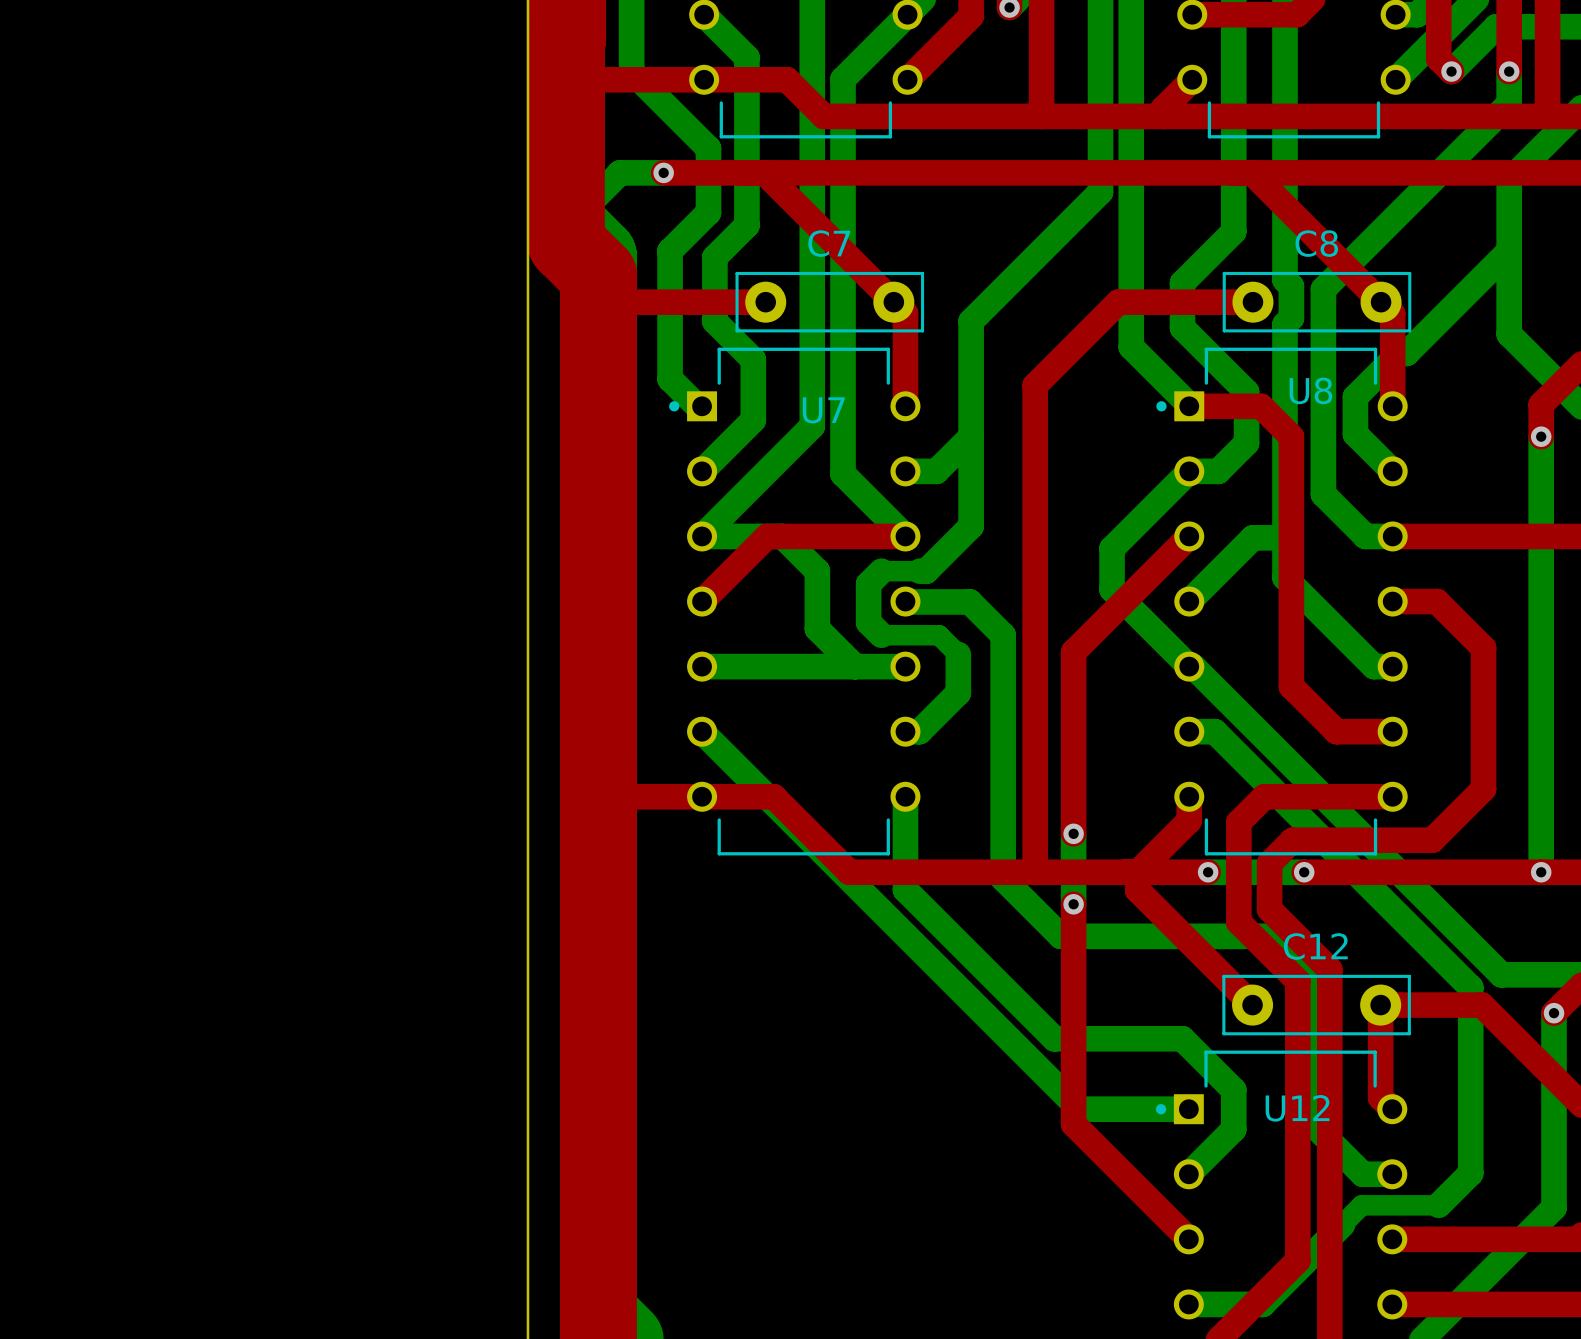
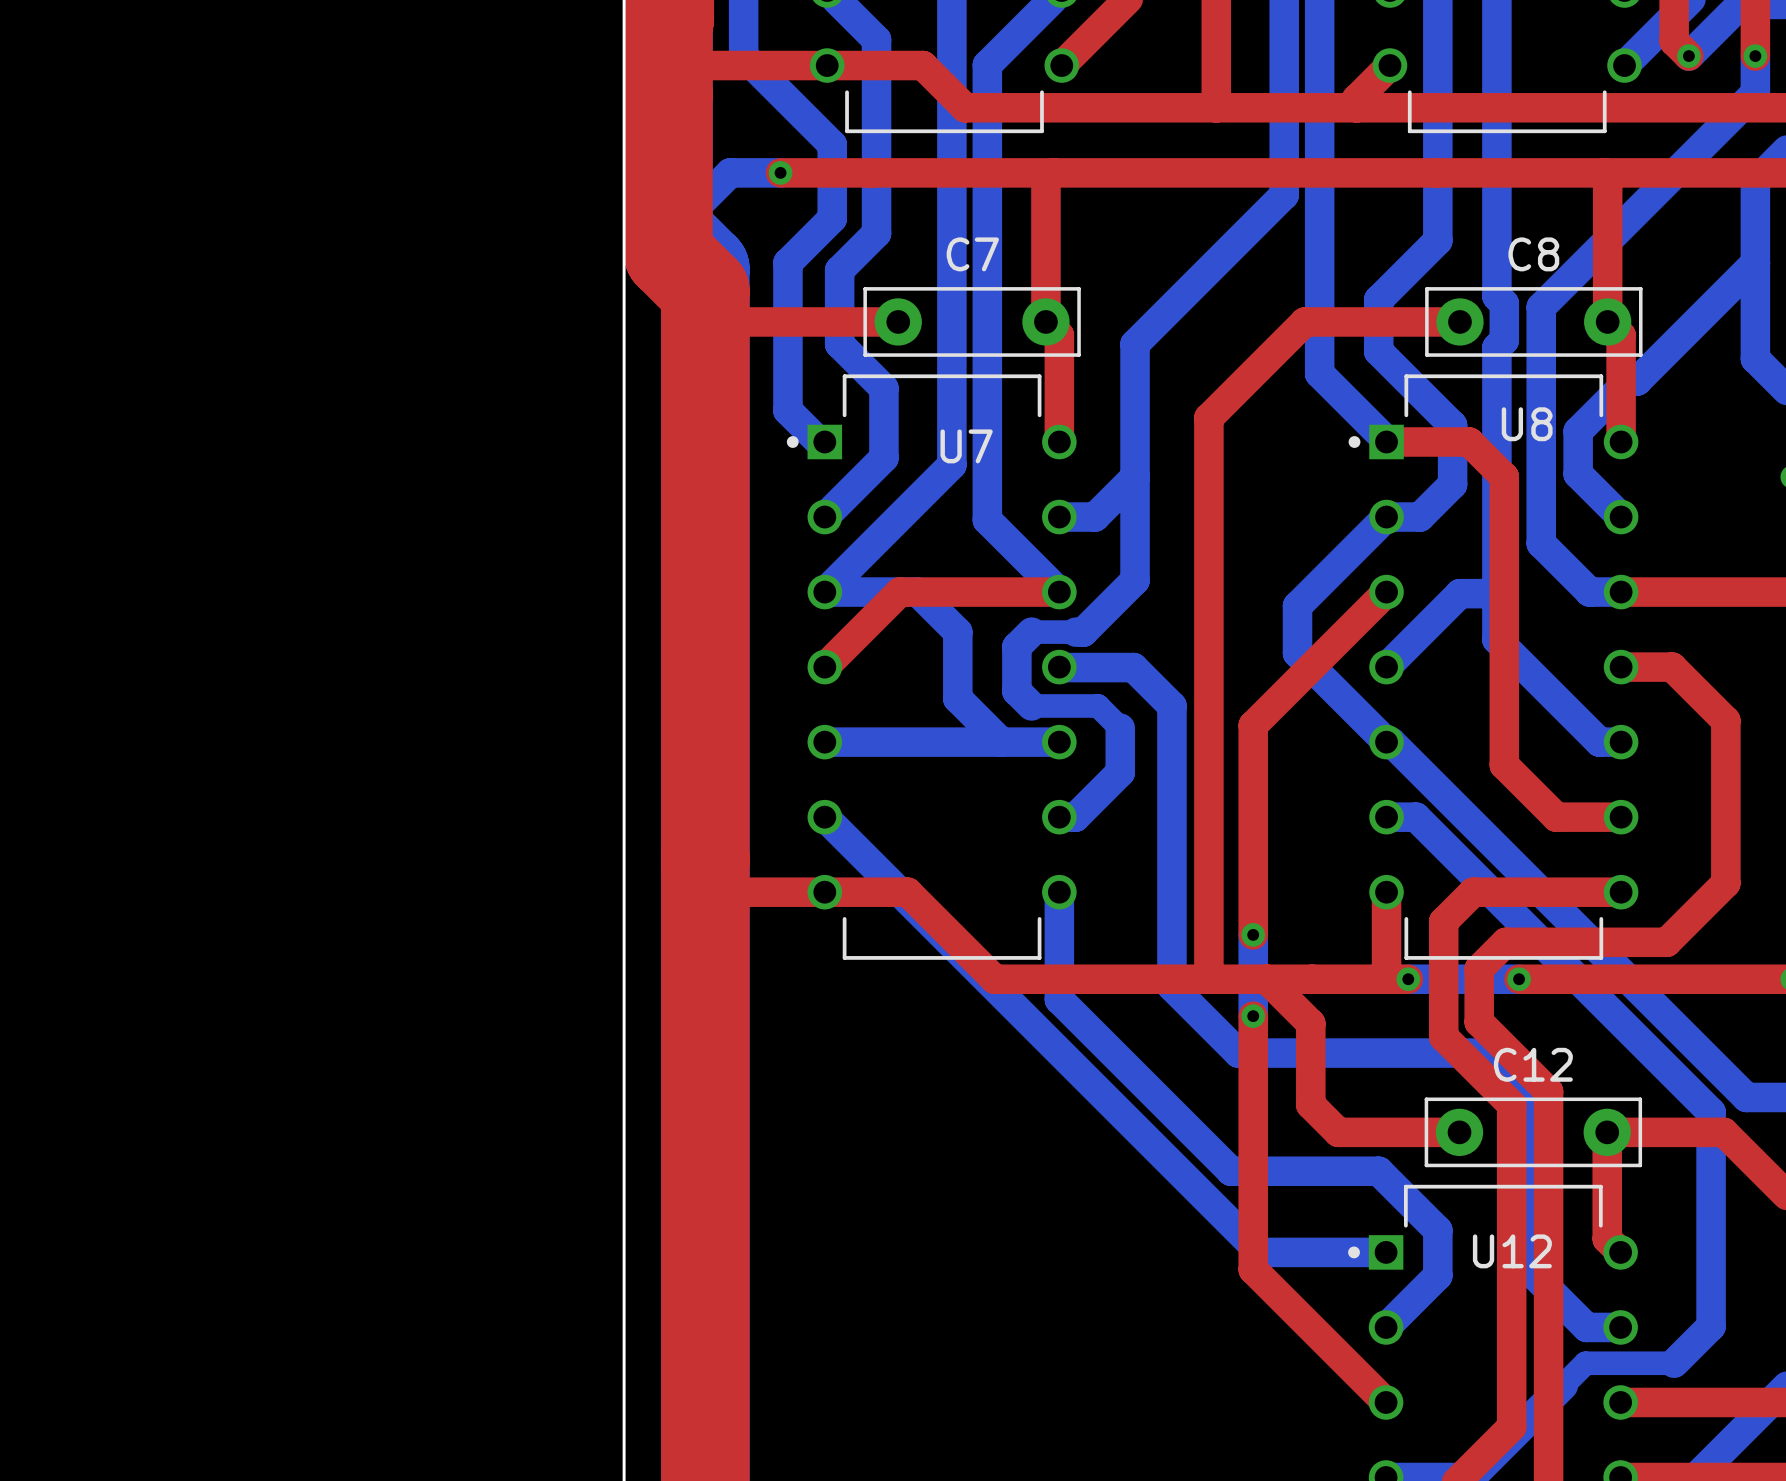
top track: (764, 172) (893, 302) -> (1053, 172) (1045, 180) (1045, 321)
top track: (1251, 172) (1381, 302) -> (1604, 172) (1607, 175) (1607, 321)
top track: (1189, 820) (1137, 872) (1137, 890) (1252, 1005) -> (1266, 979) (1310, 1023) (1310, 1104) (1338, 1132) (1459, 1132)
top track: none -> (1386, 919) (1386, 977) (1384, 979)

